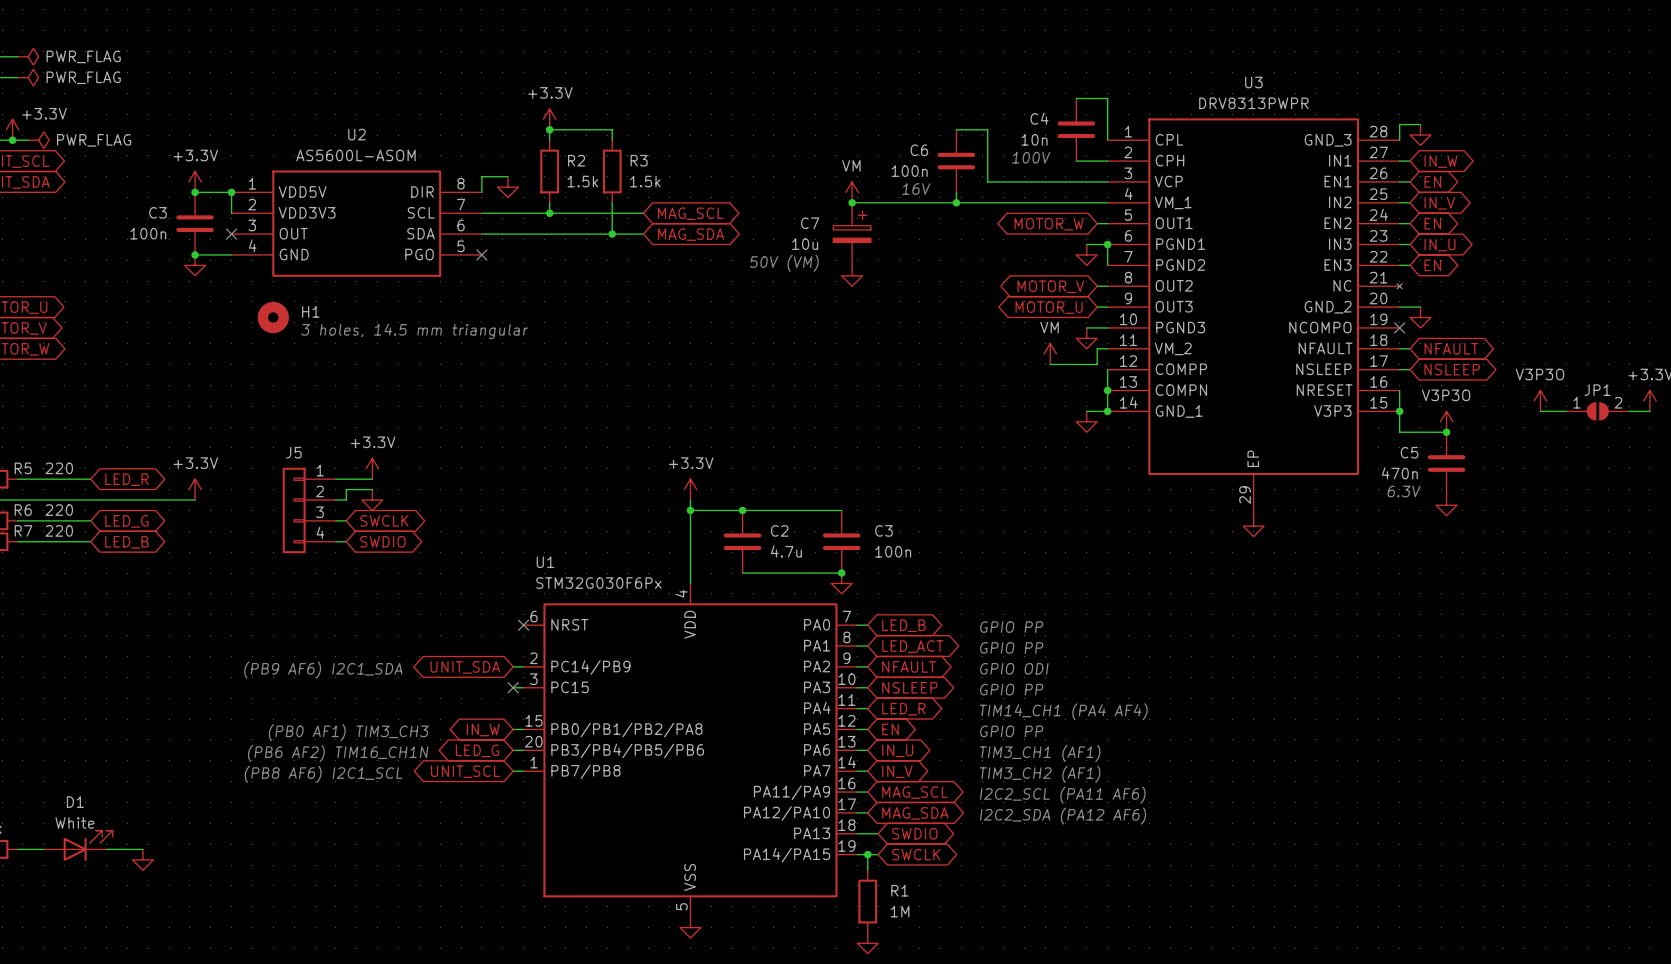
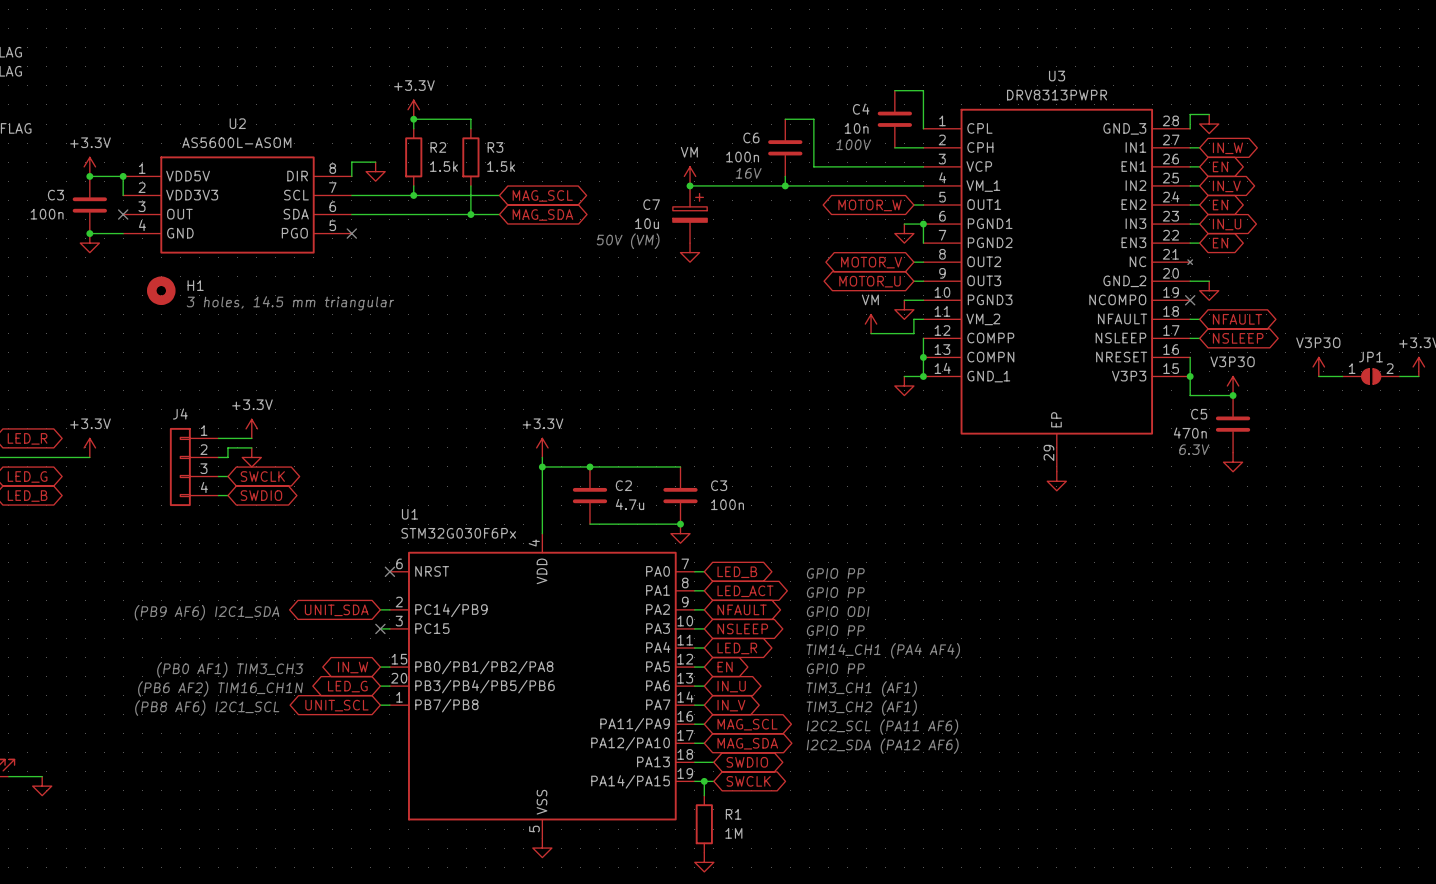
J5 name: J5 (293, 452) -> J4 (180, 414)

